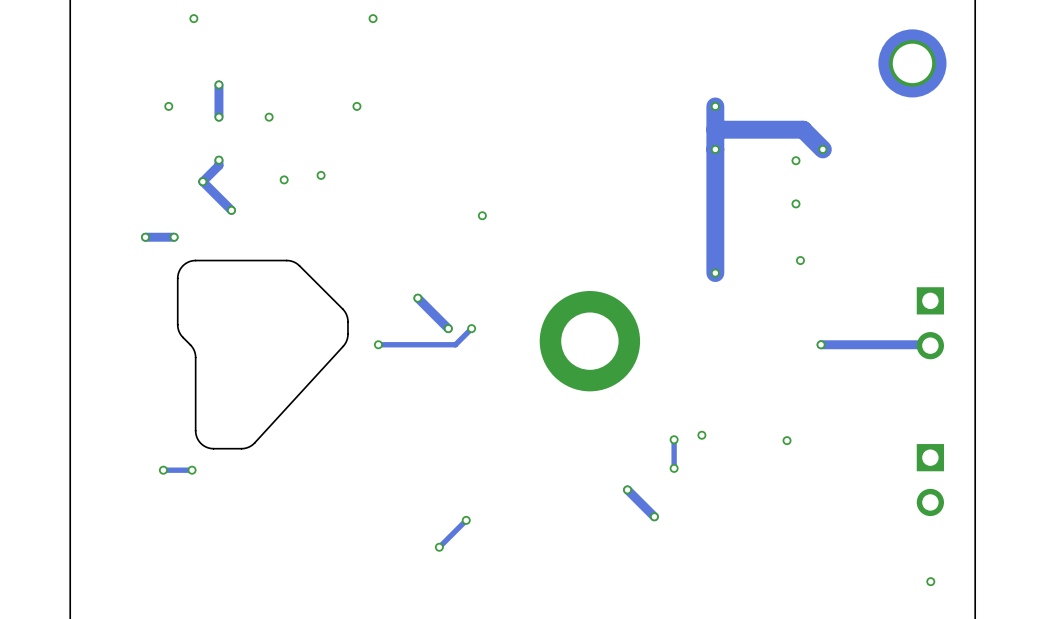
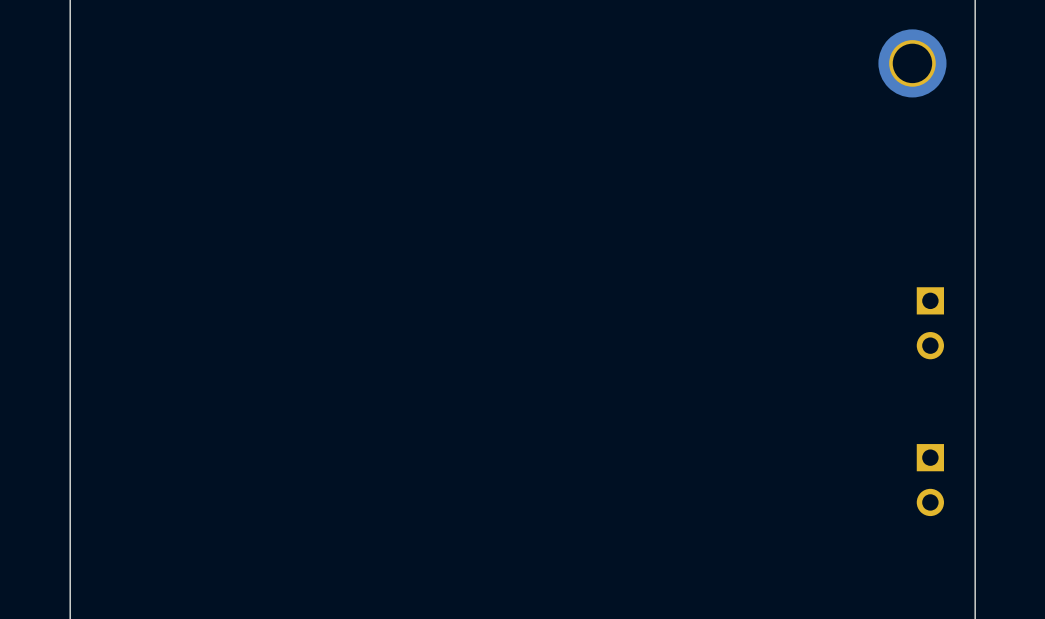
via: (193, 18) -> none
via: (373, 18) -> none
track: (218, 84) (218, 117) -> none
via: (218, 84) -> none
via: (168, 106) -> none
via: (356, 106) -> none
track: (715, 106) (715, 273) -> none
via: (715, 106) -> none
via: (218, 117) -> none
via: (269, 117) -> none
track: (715, 129) (803, 129) (822, 149) -> none
via: (715, 149) -> none
via: (822, 149) -> none
track: (218, 160) (218, 165) (202, 181) (231, 210) -> none
via: (218, 160) -> none
via: (795, 160) -> none
via: (321, 175) -> none
via: (284, 179) -> none
via: (202, 181) -> none
via: (795, 203) -> none
via: (231, 210) -> none
via: (482, 215) -> none
via: (145, 237) -> none
track: (174, 237) (145, 237) -> none
via: (174, 237) -> none
board edge: (286, 260) (193, 260) (186, 263) (179, 270) (177, 278) (178, 328) (195, 354) (195, 432) (198, 440) (205, 446) (241, 448) (251, 445) (346, 340) (347, 319) (343, 310) (297, 264) (286, 260) -> none
via: (800, 260) -> none
via: (715, 273) -> none
track: (417, 298) (448, 328) -> none
via: (417, 298) -> none
via: (448, 328) -> none
track: (471, 328) (455, 344) (378, 344) -> none
via: (471, 328) -> none
part: (589, 341) -> none
via: (378, 344) -> none
track: (821, 344) (930, 345) -> none
via: (821, 344) -> none
via: (701, 435) -> none
track: (674, 439) (674, 468) -> none
via: (674, 439) -> none
via: (787, 440) -> none
via: (674, 468) -> none
via: (163, 470) -> none
track: (192, 470) (163, 470) -> none
via: (192, 470) -> none
track: (627, 489) (654, 516) -> none
via: (627, 489) -> none
via: (654, 516) -> none
track: (466, 520) (439, 547) -> none
via: (466, 520) -> none
via: (439, 547) -> none
via: (930, 581) -> none

